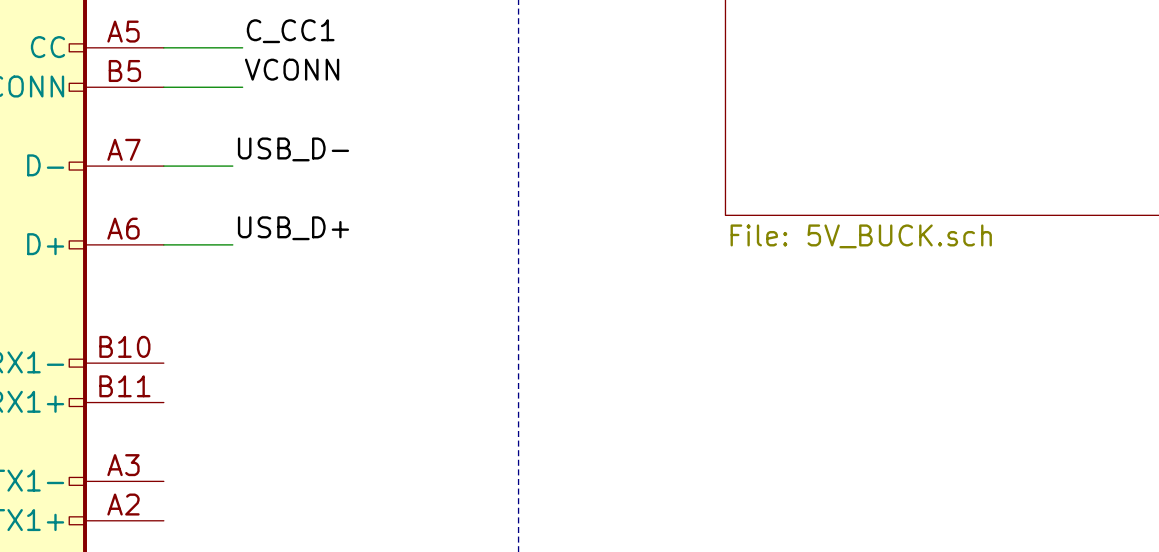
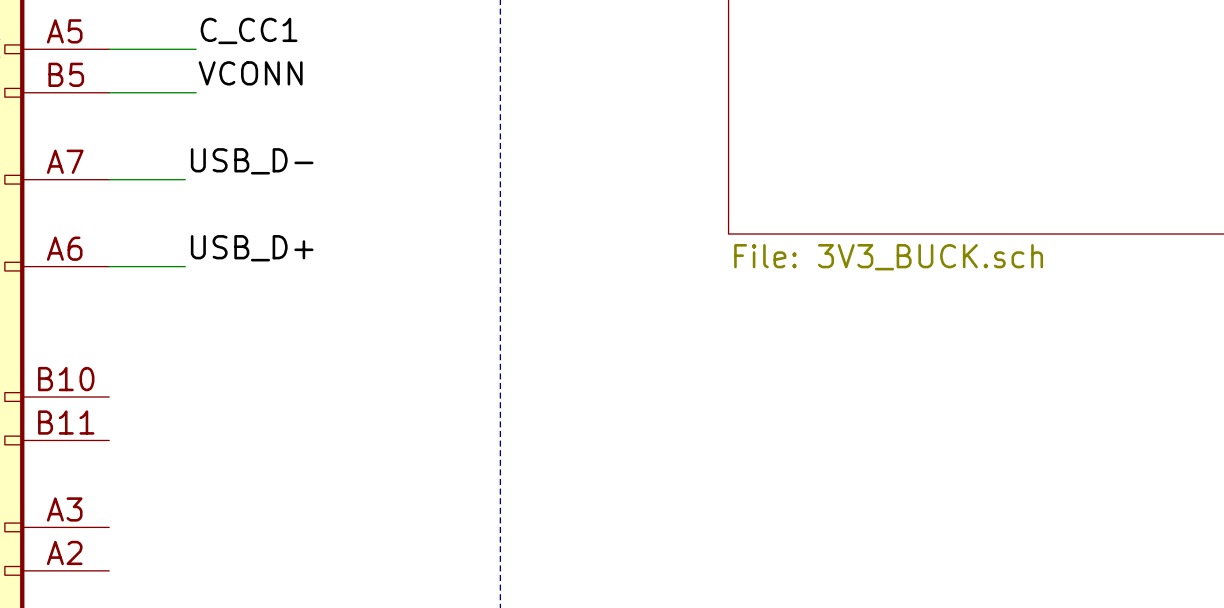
sheet value: File: 5V_BUCK.sch (861, 236) -> File: 3V3_BUCK.sch (888, 257)

